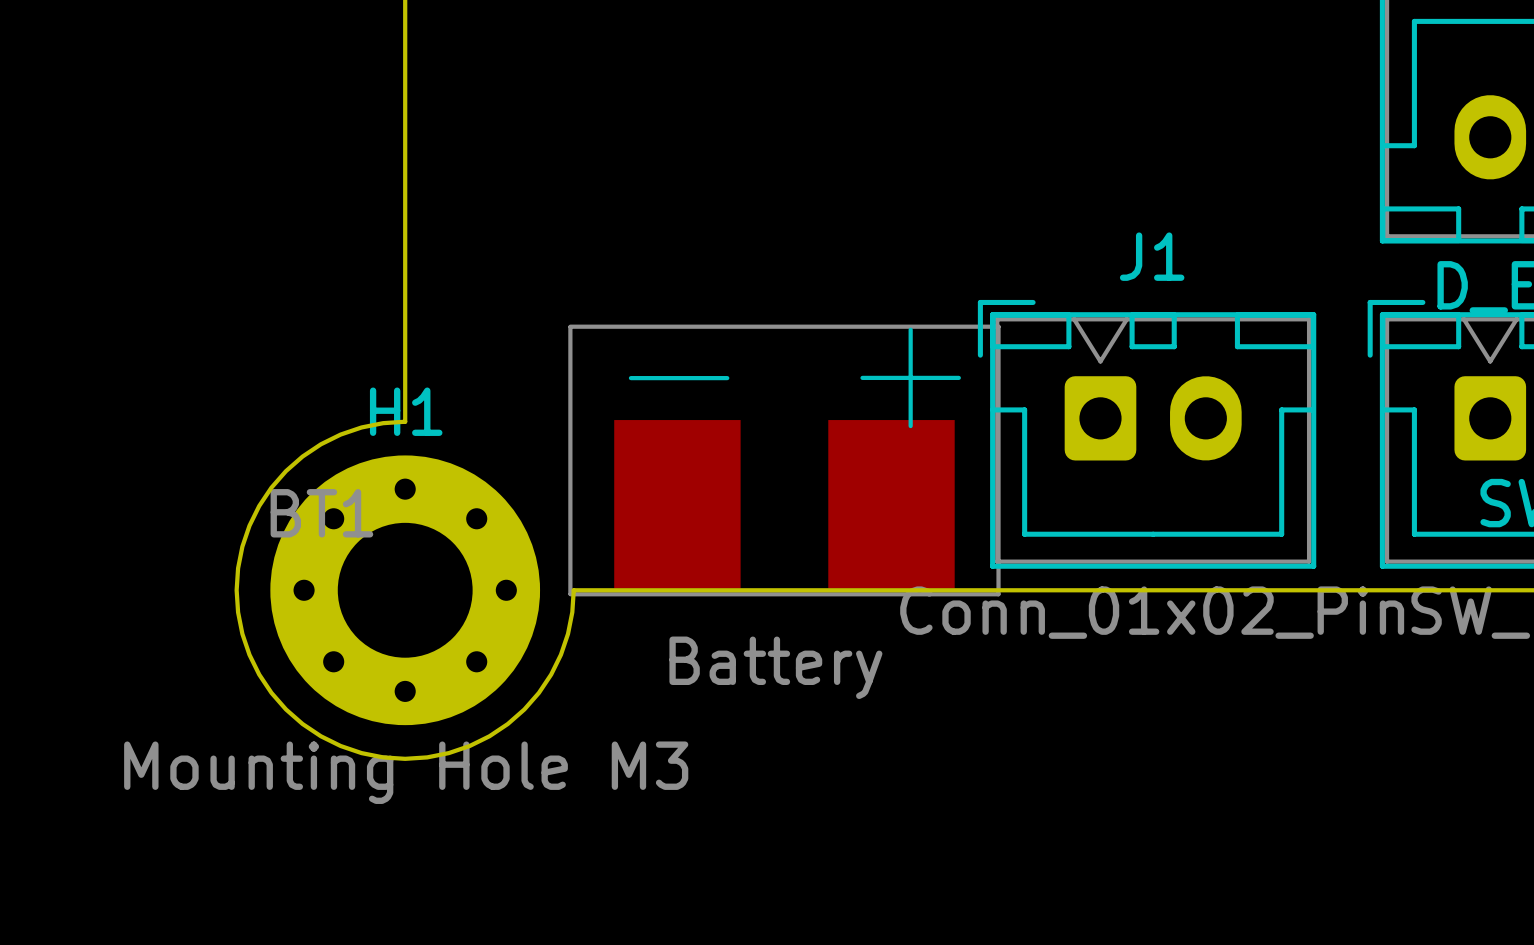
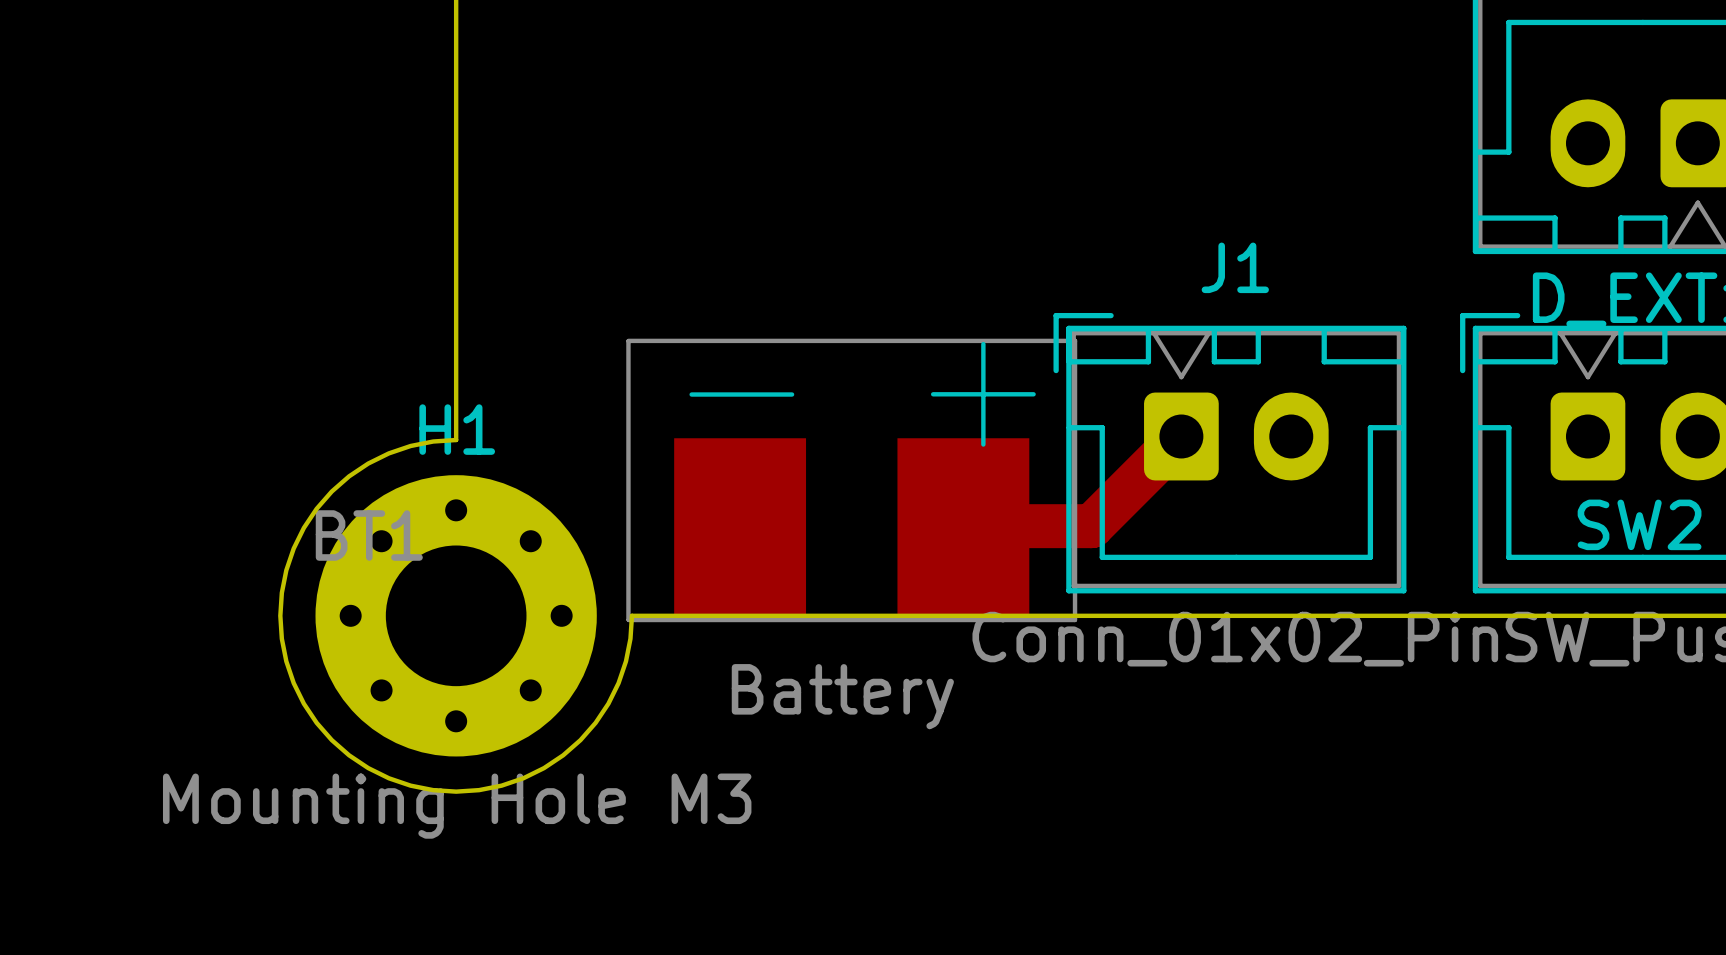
track: none -> (1181, 436) (1091, 526) (963, 526)

